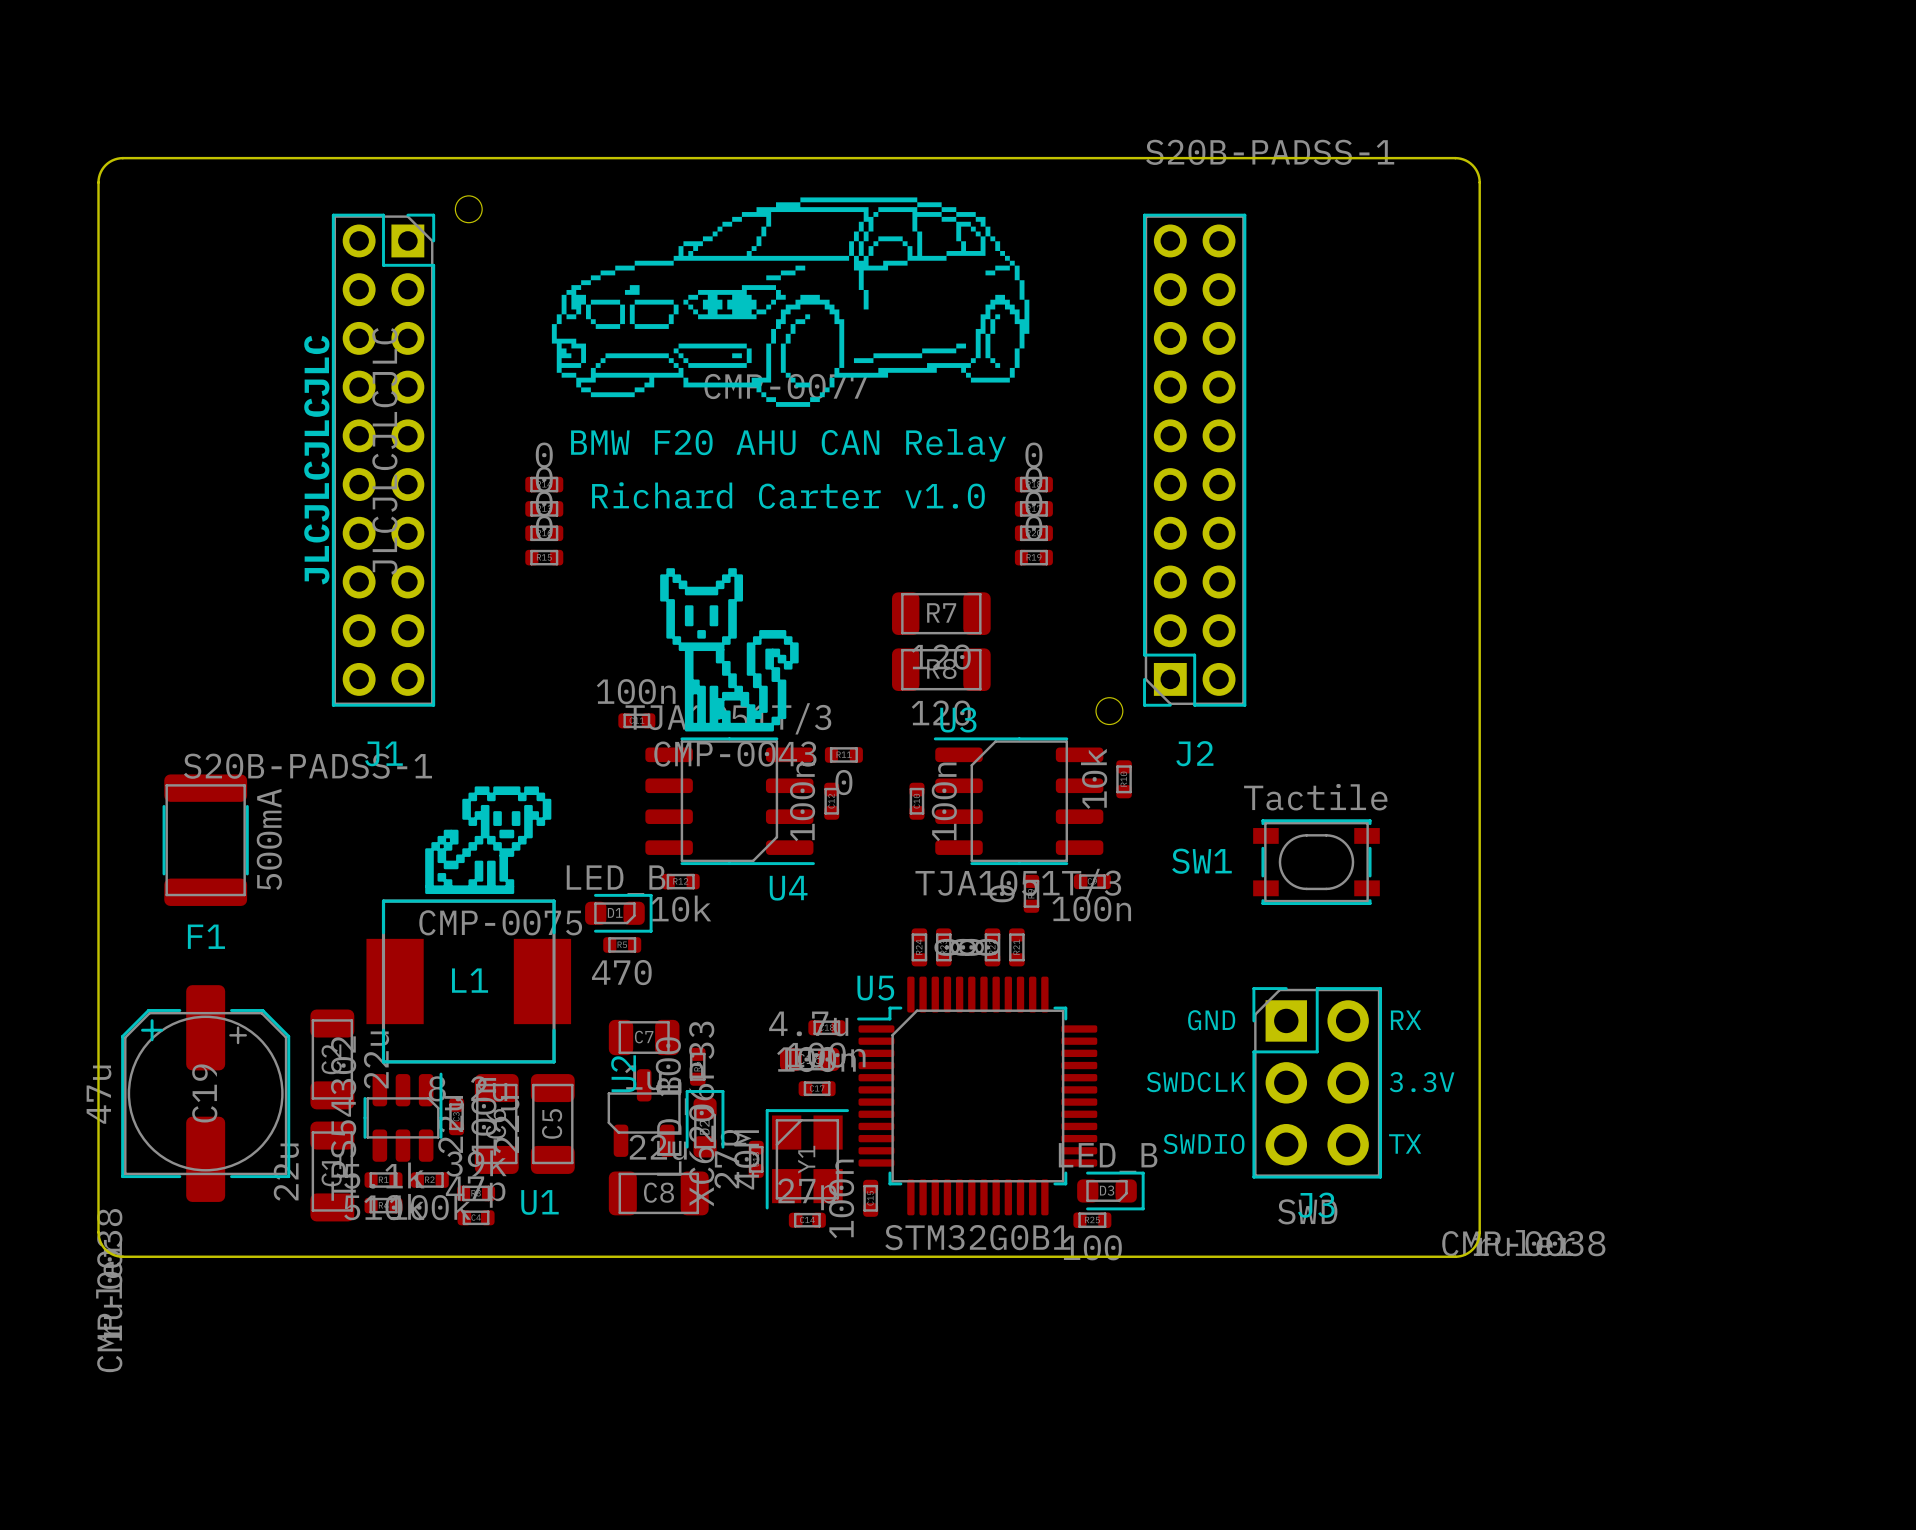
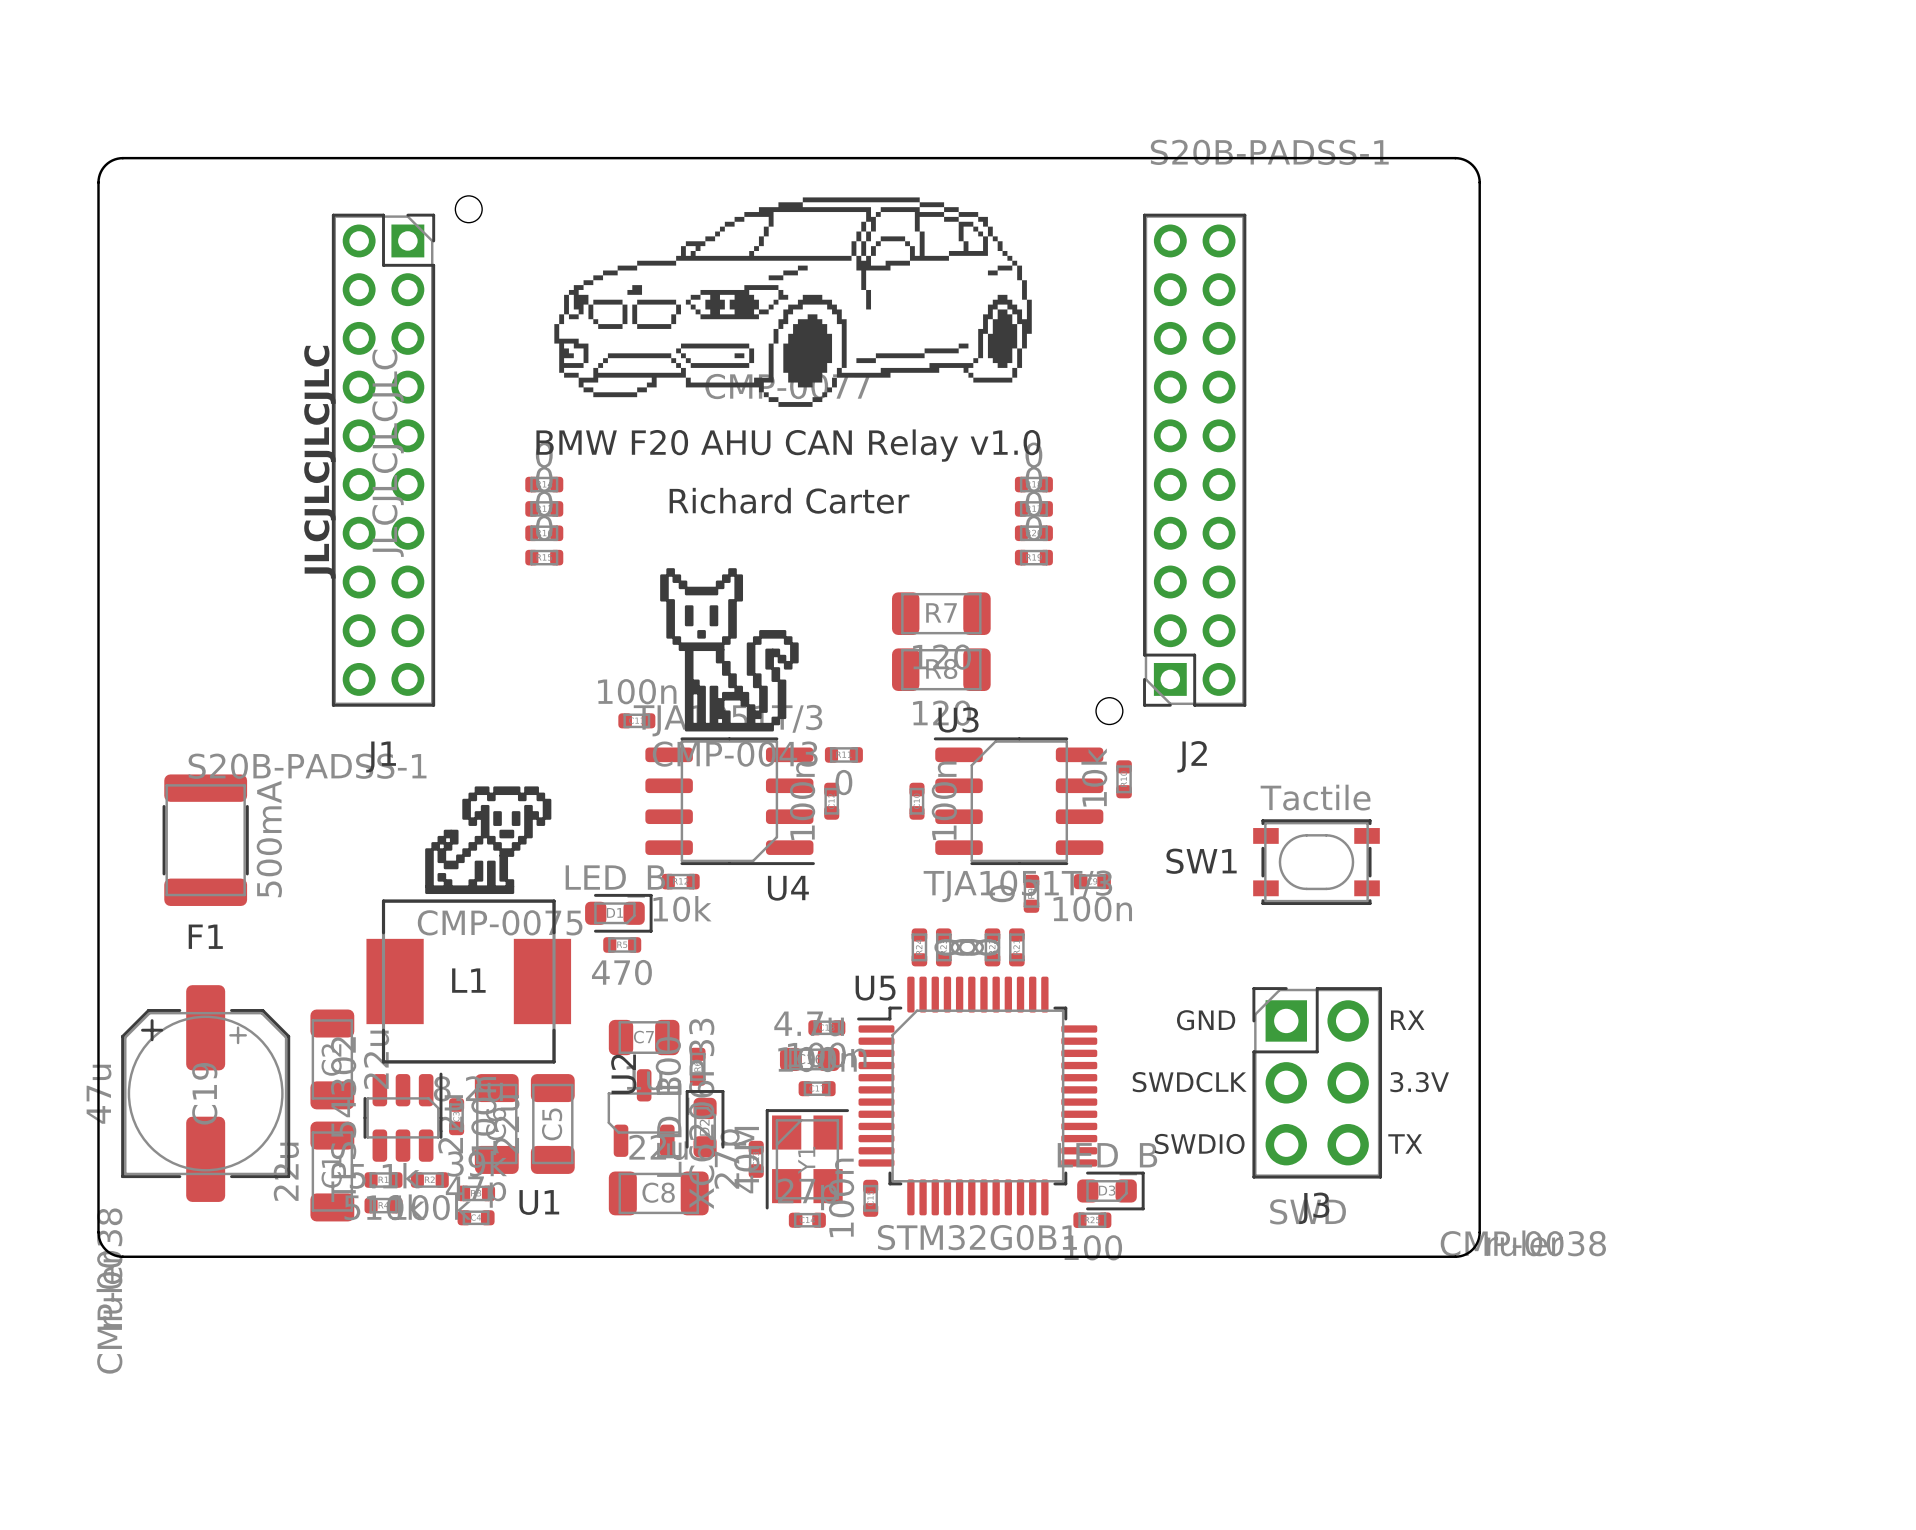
drawing shape: [551, 197, 1030, 407] -> [554, 197, 1032, 407]
text: BMW F20 AHU CAN Relay (788, 445) -> BMW F20 AHU CAN Relay v1.0 (788, 445)
text: Richard Carter v1.0 (788, 495) -> Richard Carter (789, 500)

